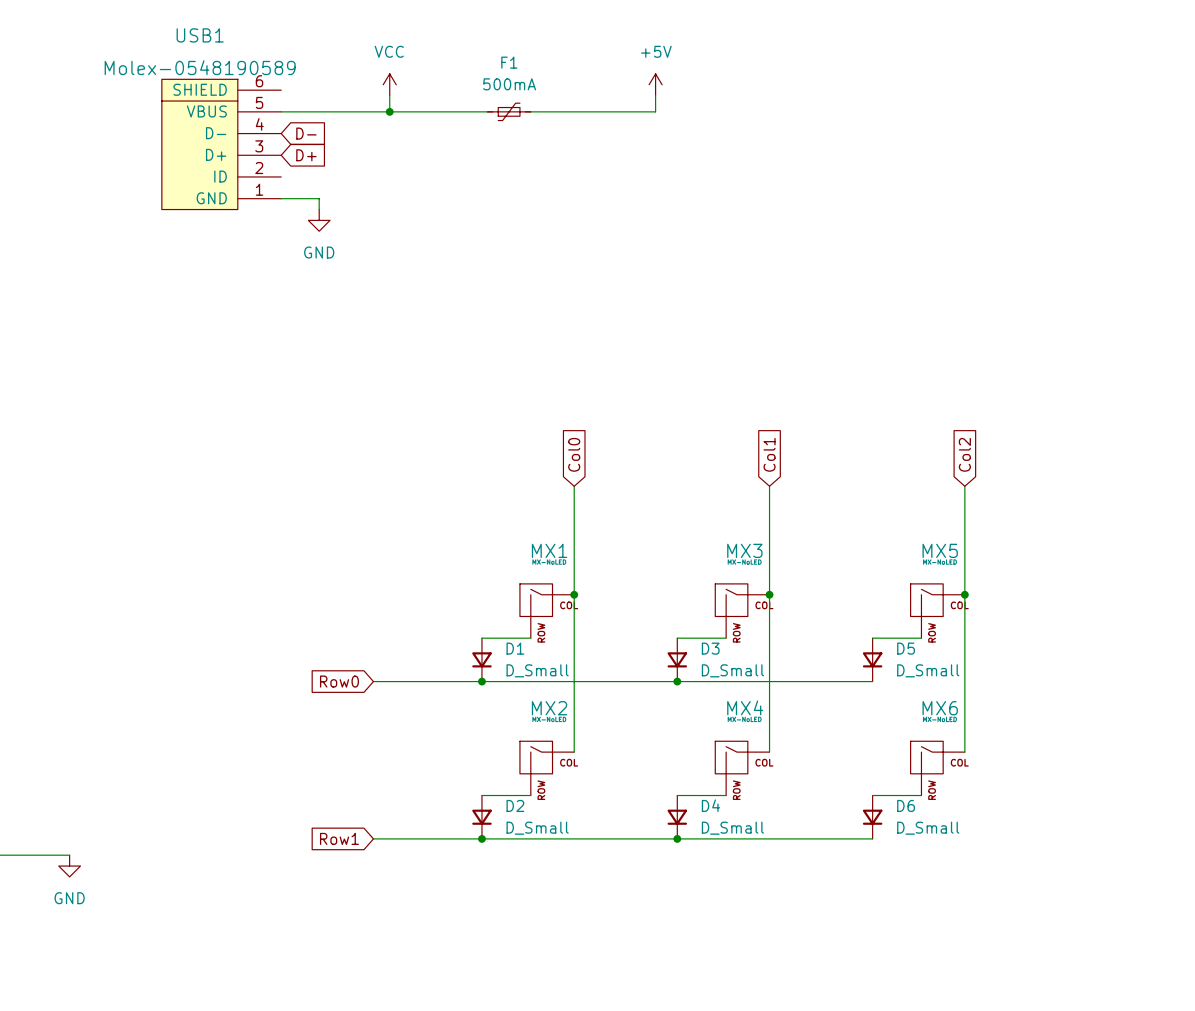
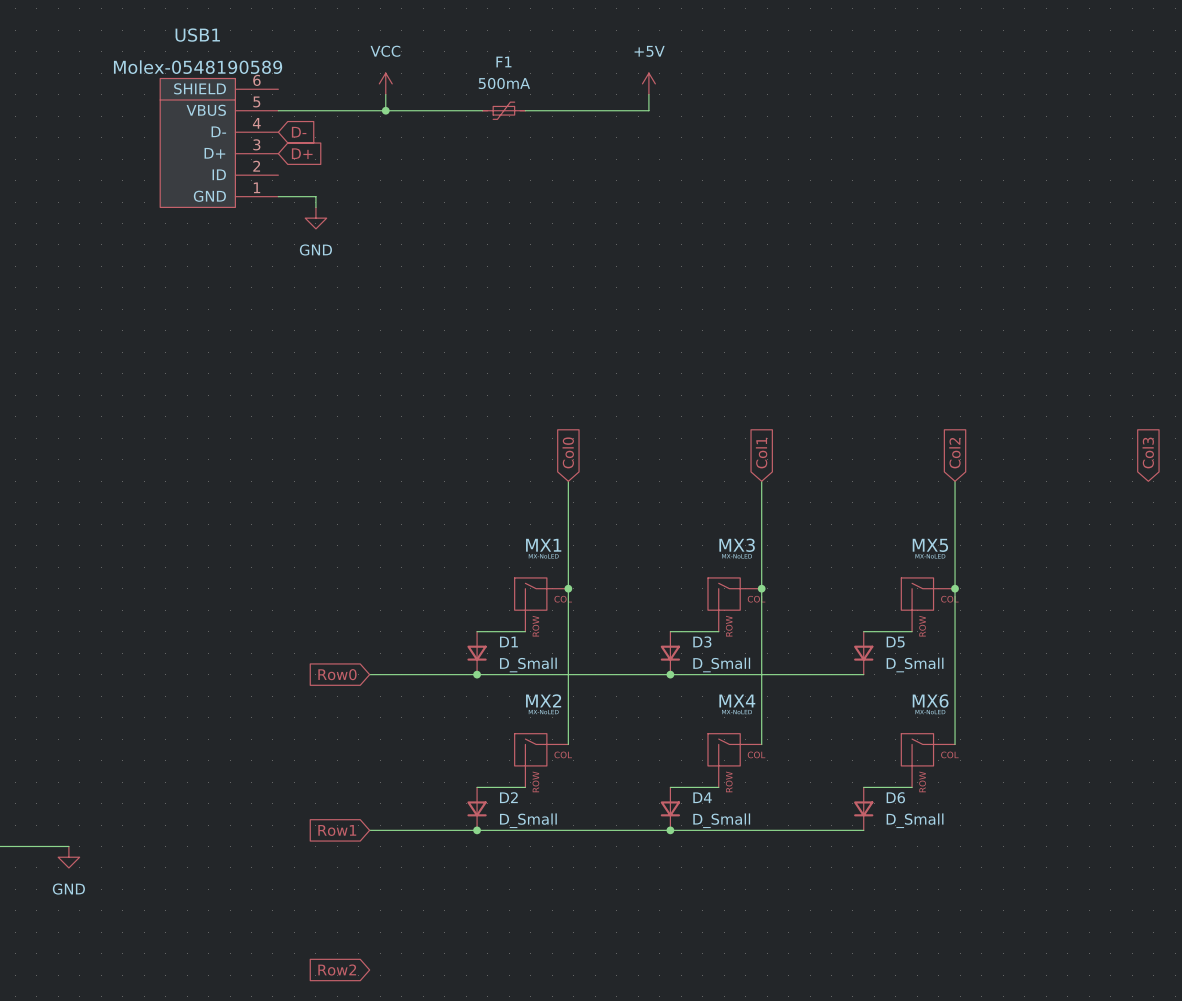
global label: none -> Col3 (1148, 453)
global label: none -> Row2 (337, 970)

